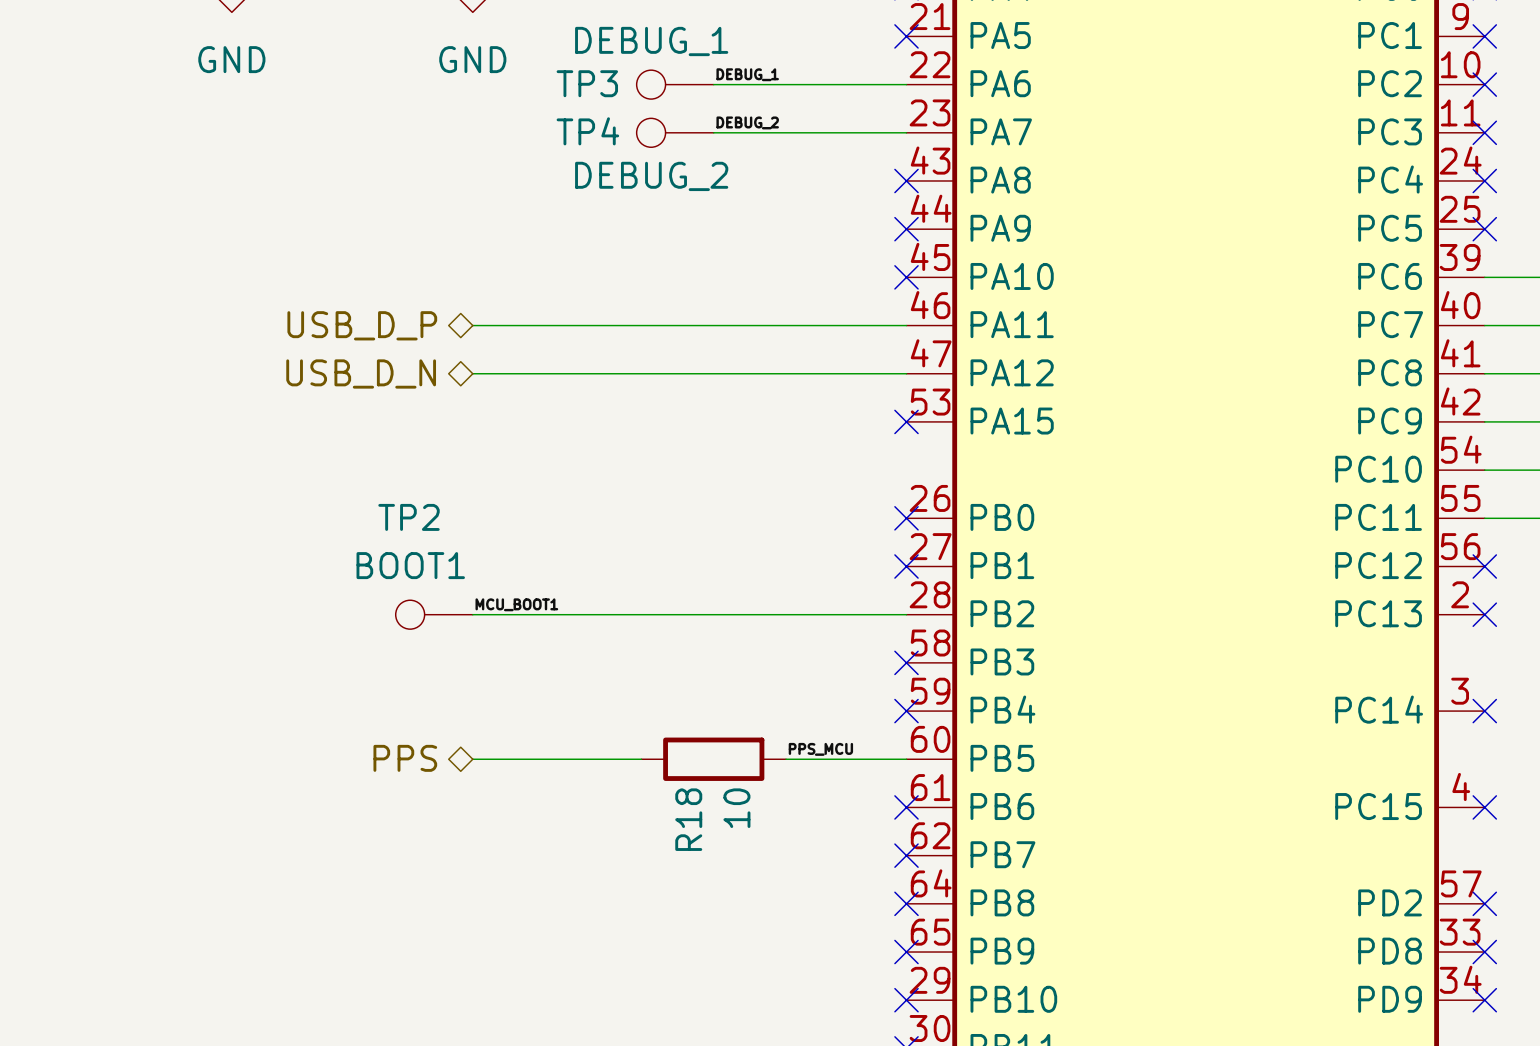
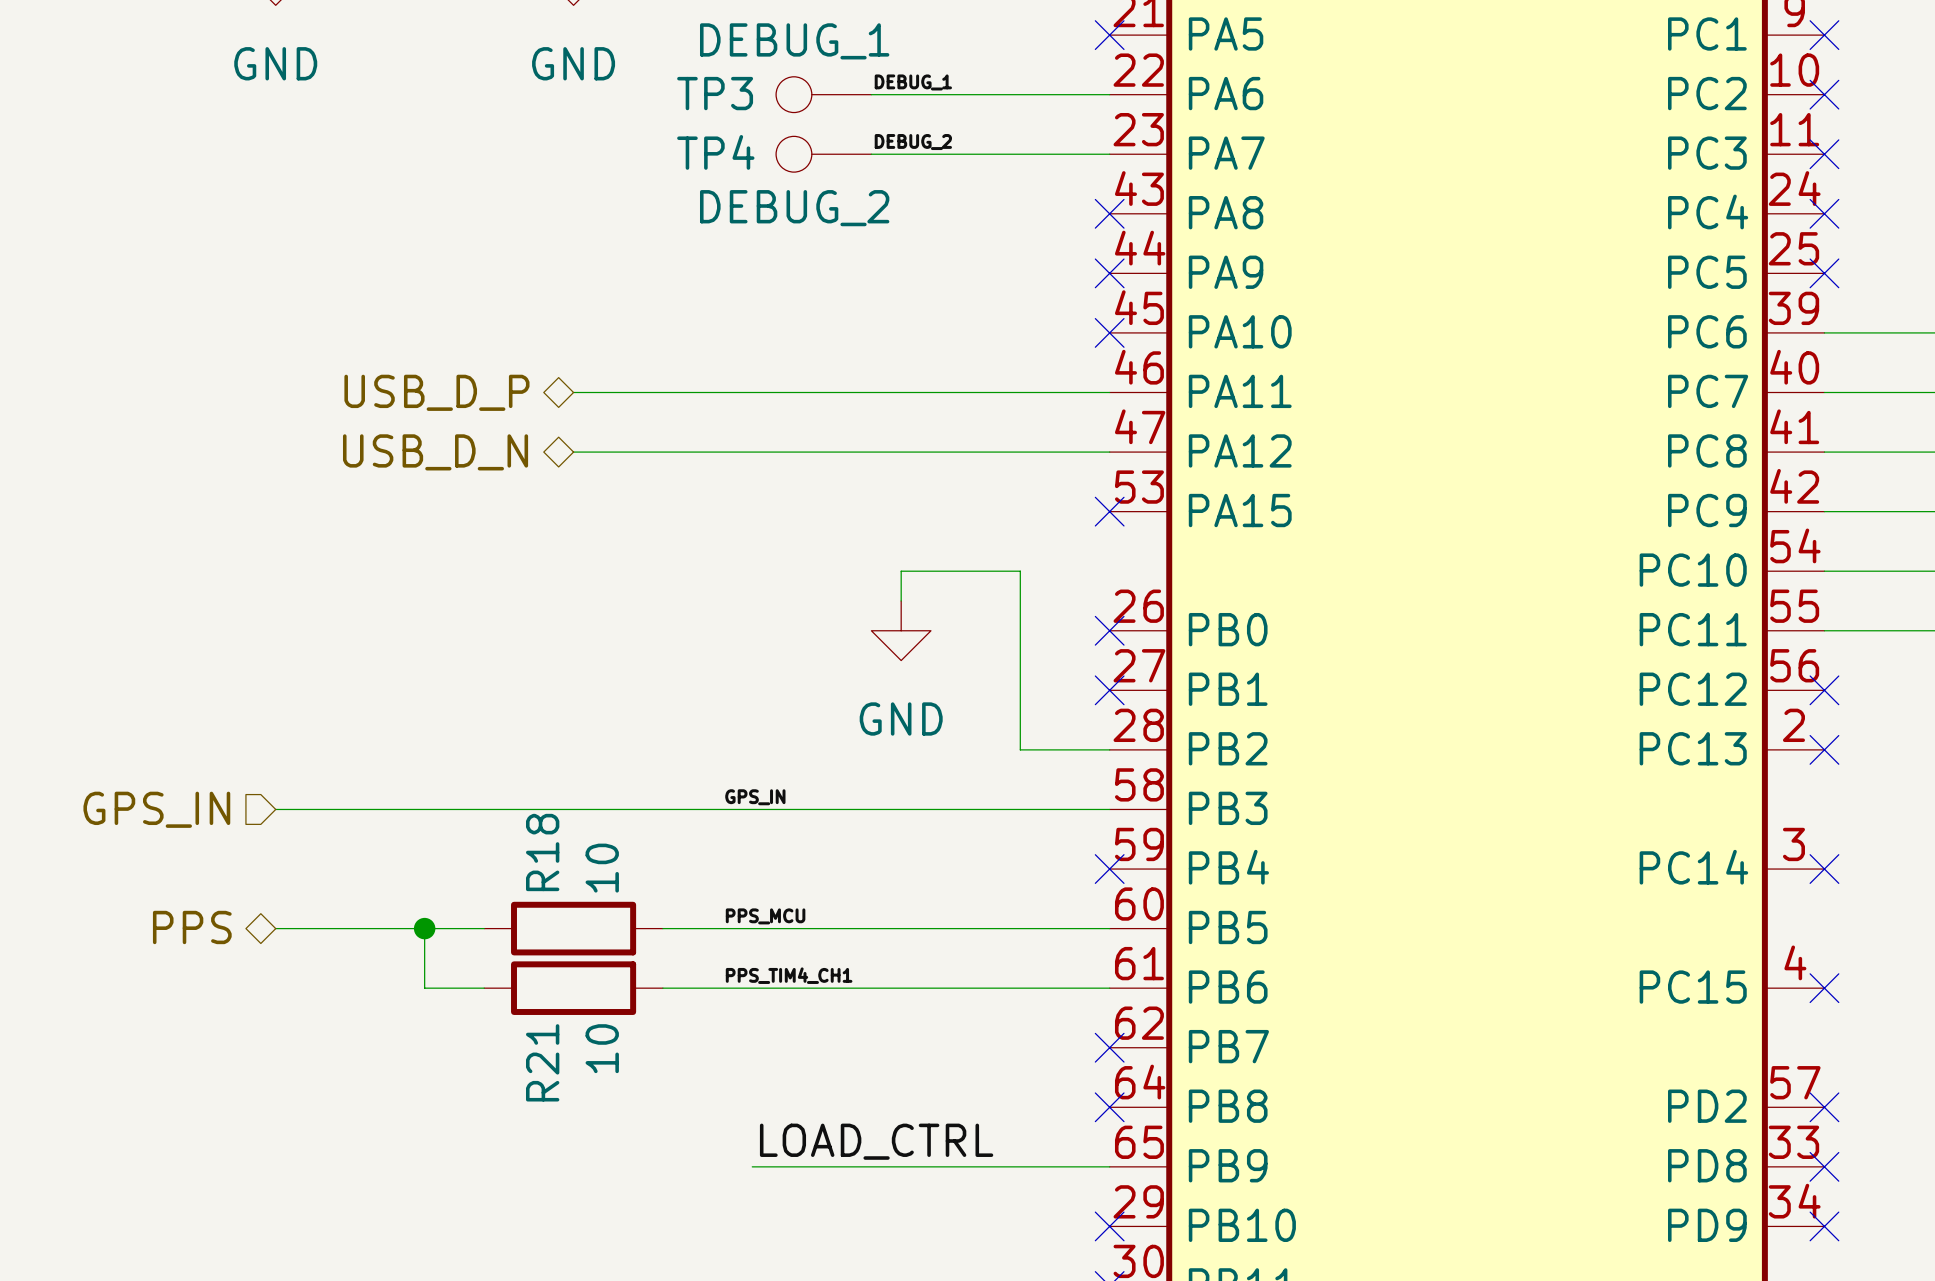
power symbol: none -> GND (901, 630)
label: MCU_BOOT1 (516, 604) -> none
TP2: BOOT1 (434, 614) -> none
wire: (472, 614) (834, 614) -> (901, 600) (901, 571) (1020, 571) (1020, 749)
label: none -> GPS_IN (755, 797)
wire: none -> (275, 809) (1109, 809)
no-connect mark: (906, 662) -> none
hierarchical label: none -> GPS_IN (156, 809)
label position: PPS_MCU (820, 749) -> PPS_MCU (765, 916)
hierarchical label position: PPS (405, 758) -> PPS (192, 927)
wire: none -> (275, 928) (484, 928)
wire: none -> (424, 928) (424, 988) (484, 988)
junction: none -> (424, 928)
wire: (472, 759) (545, 759) -> none
wire: none -> (782, 928) (960, 928)
R18 position: (713, 759) -> (573, 928)
label: none -> PPS_TIM4_CH1 (789, 975)
R21: none -> 10 (573, 988)
wire: none -> (662, 988) (1109, 988)
no-connect mark: (906, 807) -> none
R18 value position: 10 (736, 808) -> 10 (602, 868)
R18 name position: R18 (688, 819) -> R18 (542, 852)
label: none -> LOAD_CTRL (876, 1141)
wire: none -> (752, 1166) (1109, 1166)
no-connect mark: (906, 952) -> none

